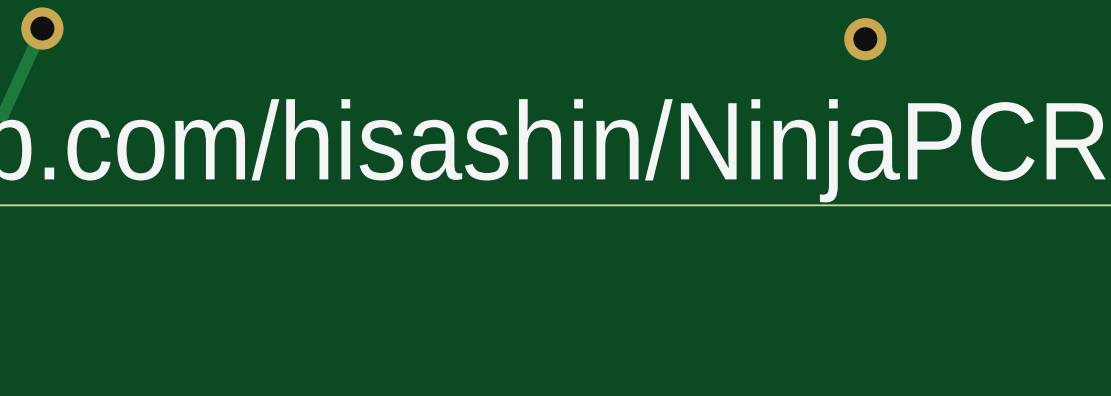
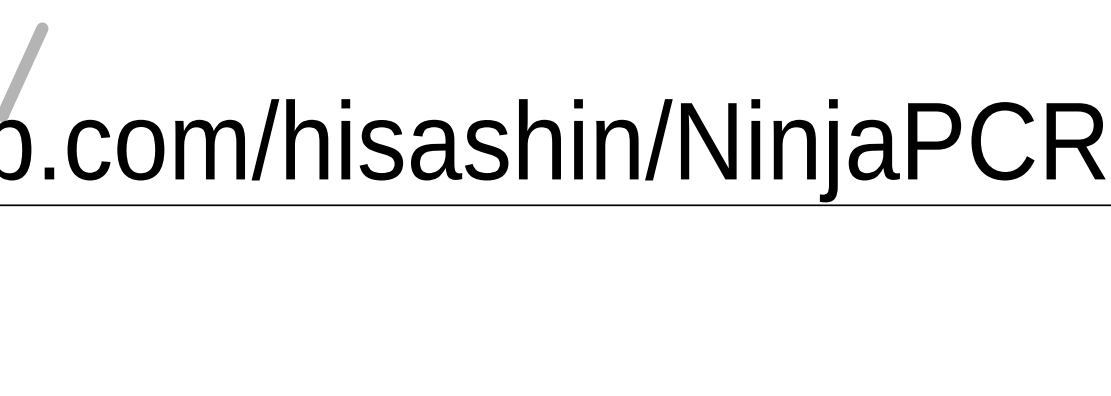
via: (42, 28) -> none
via: (865, 39) -> none

